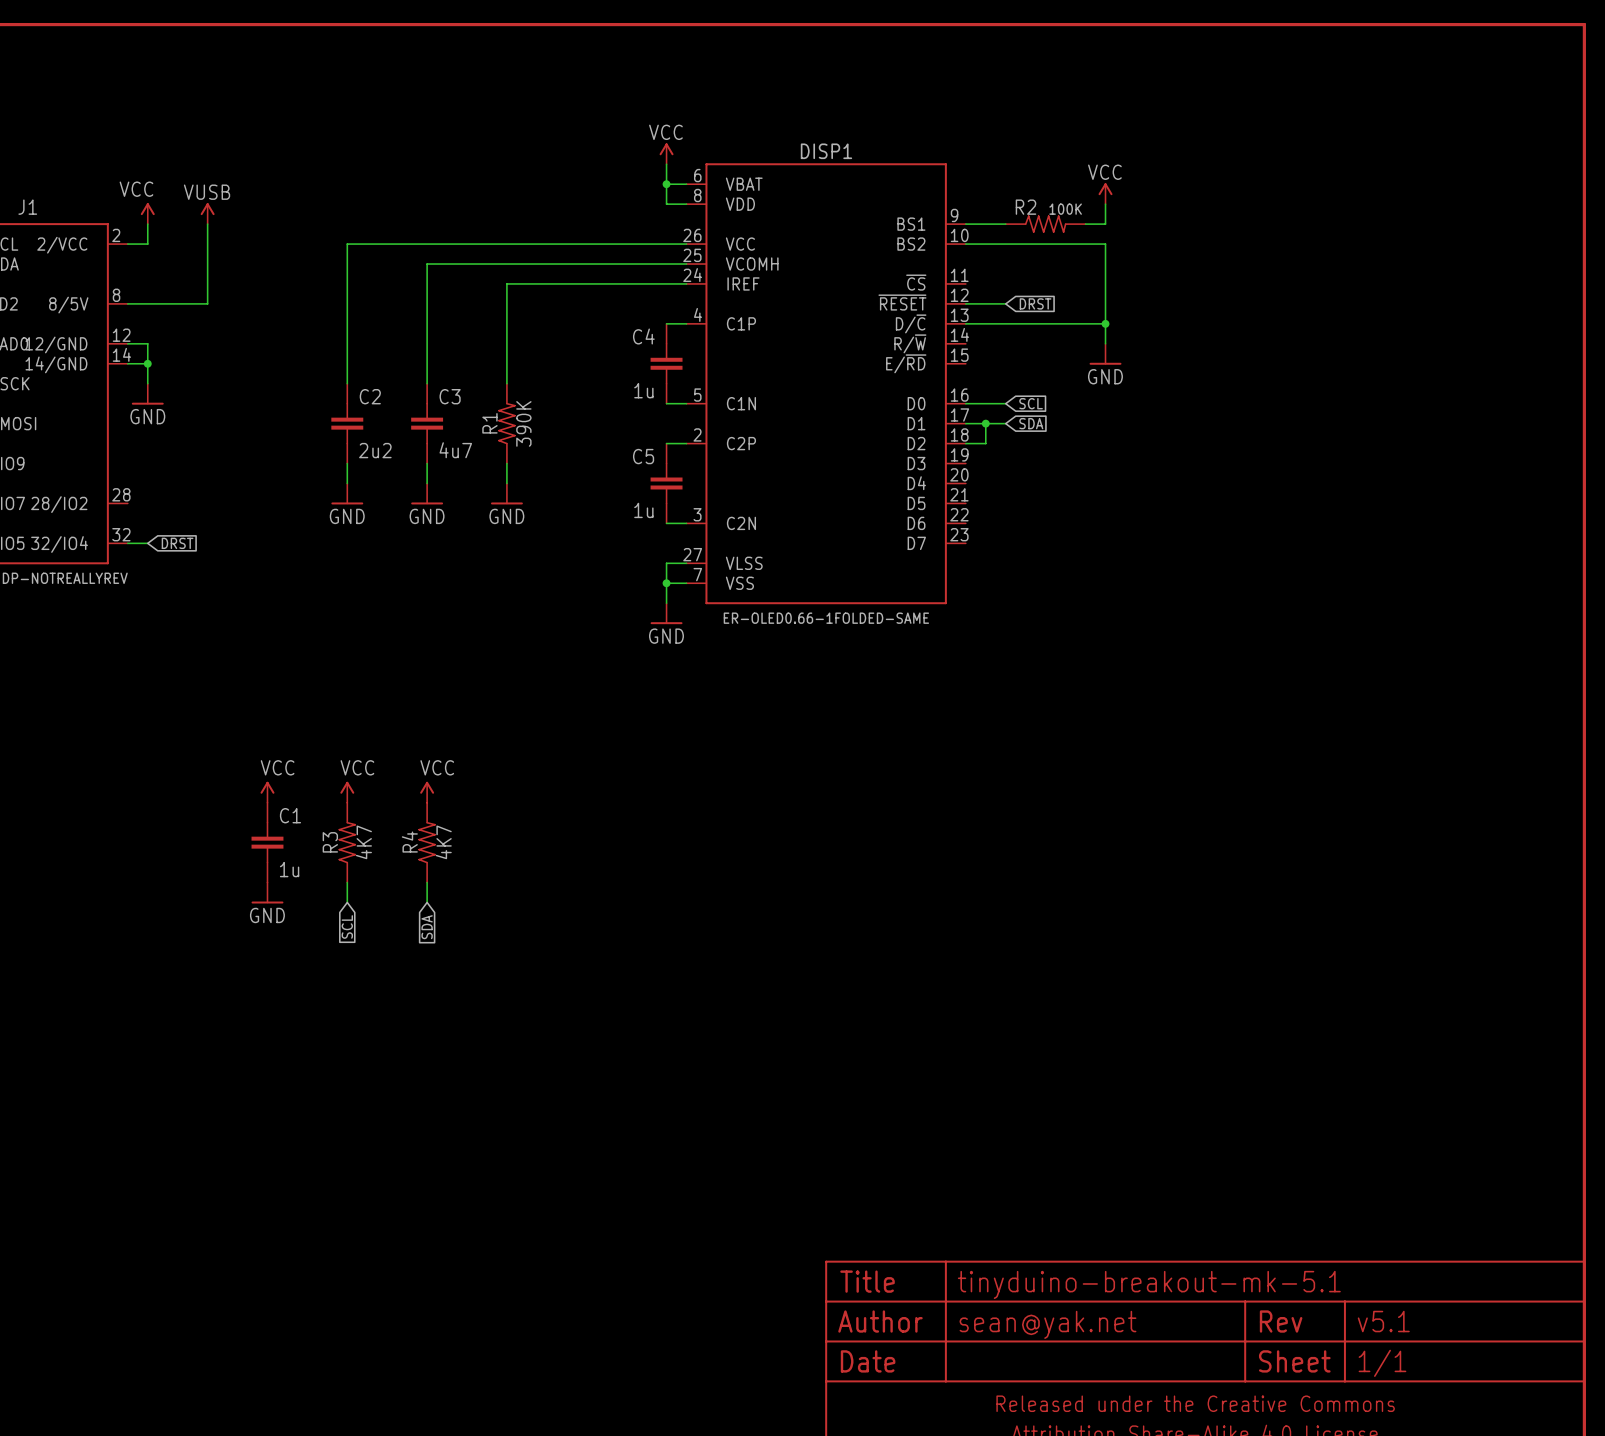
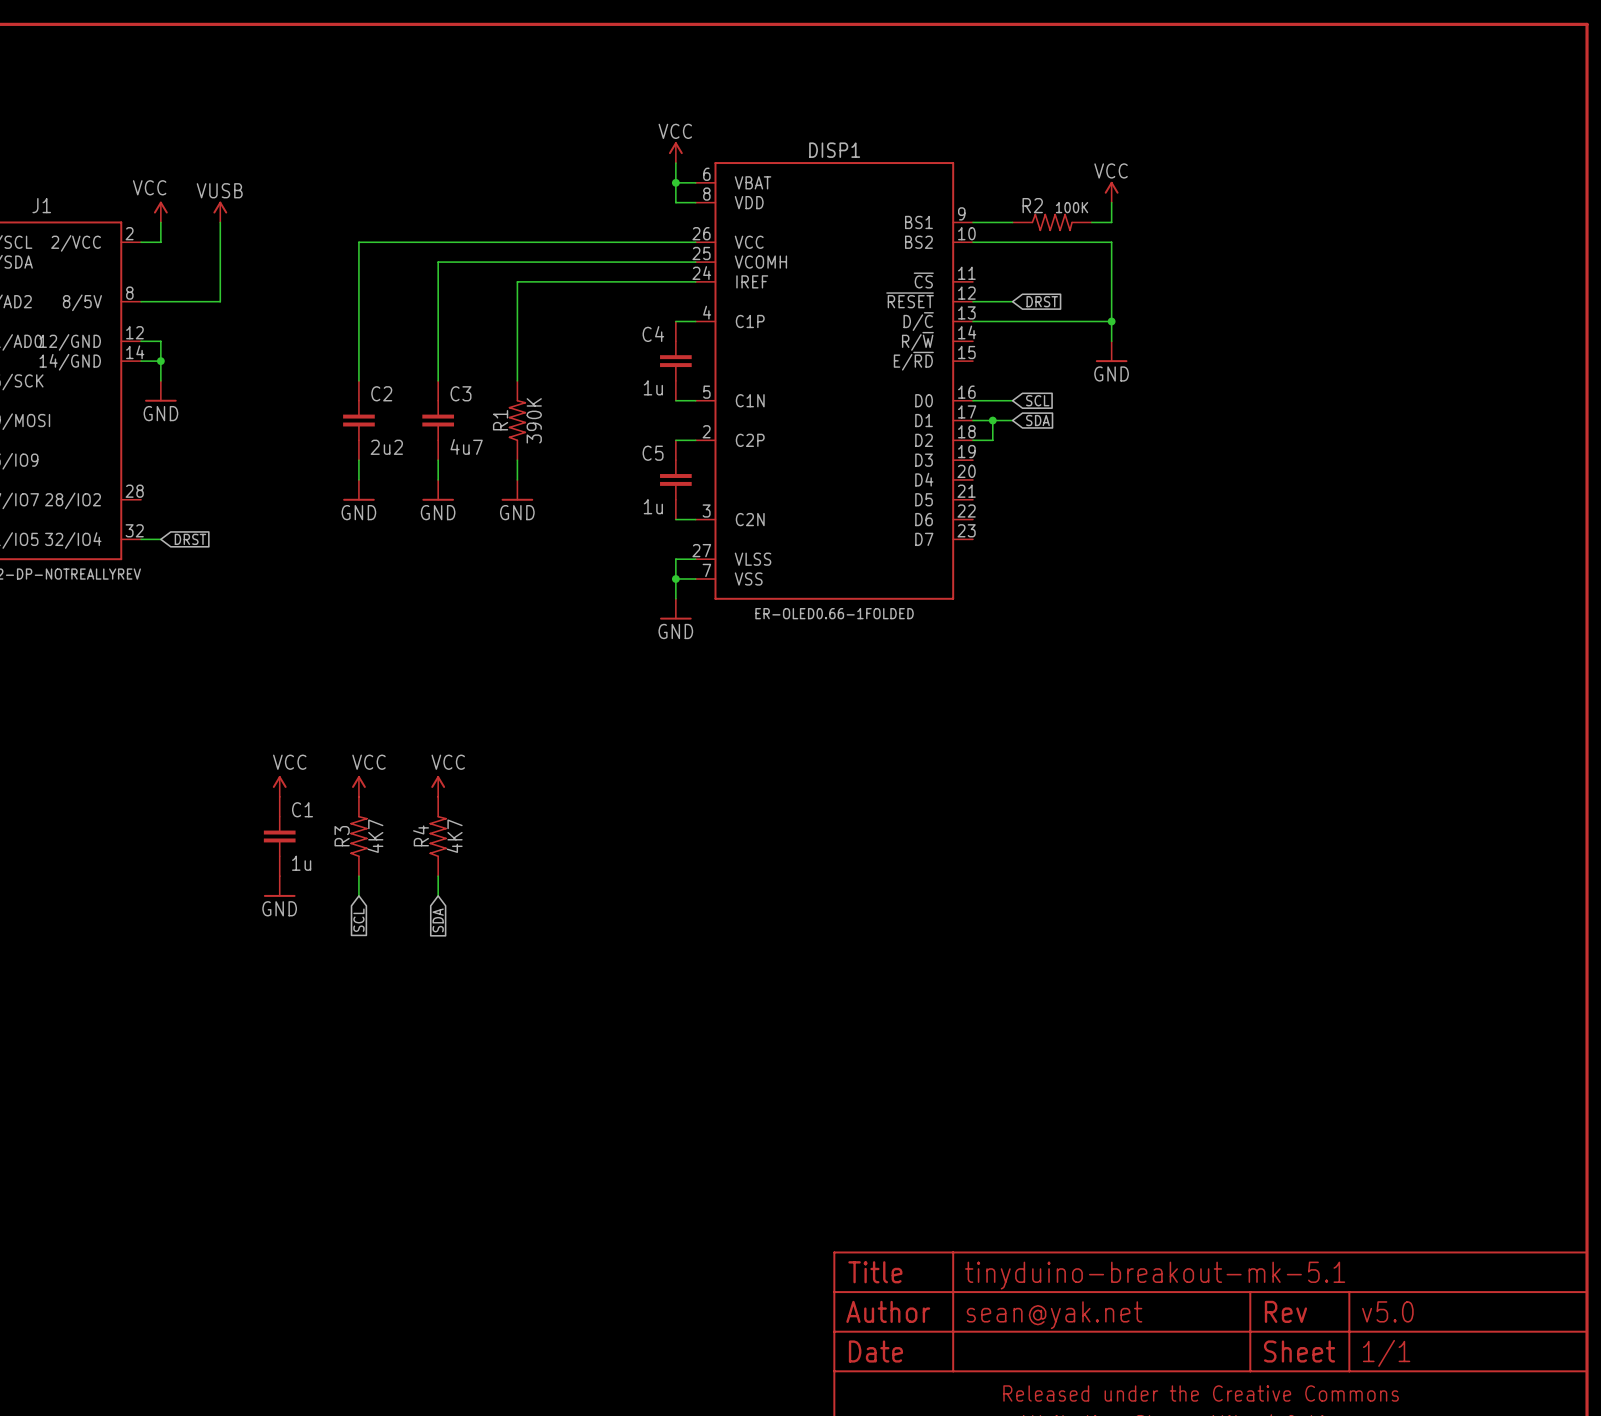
DISP1 value: ER-OLED0.66-1FOLDED-SAME (826, 618) -> ER-OLED0.66-1FOLDED (834, 613)
part text: v5.1 (1383, 1321) -> v5.0 (1387, 1311)

